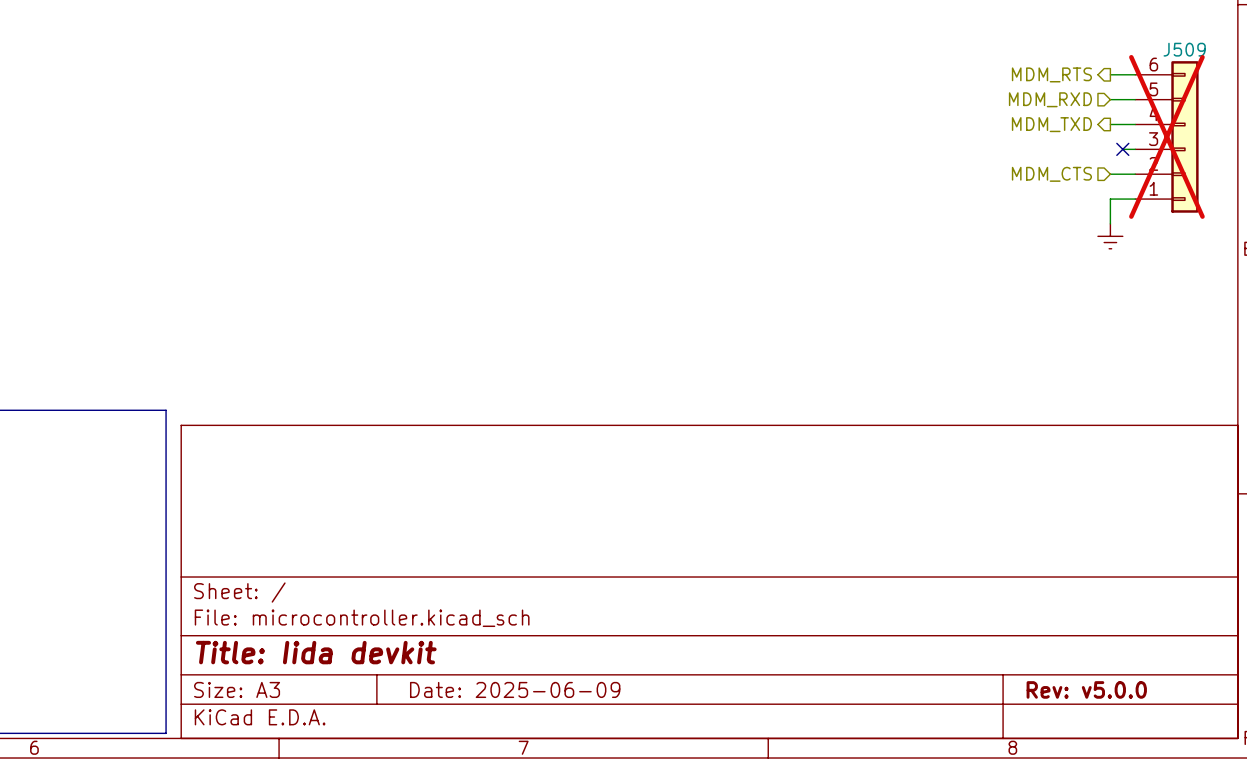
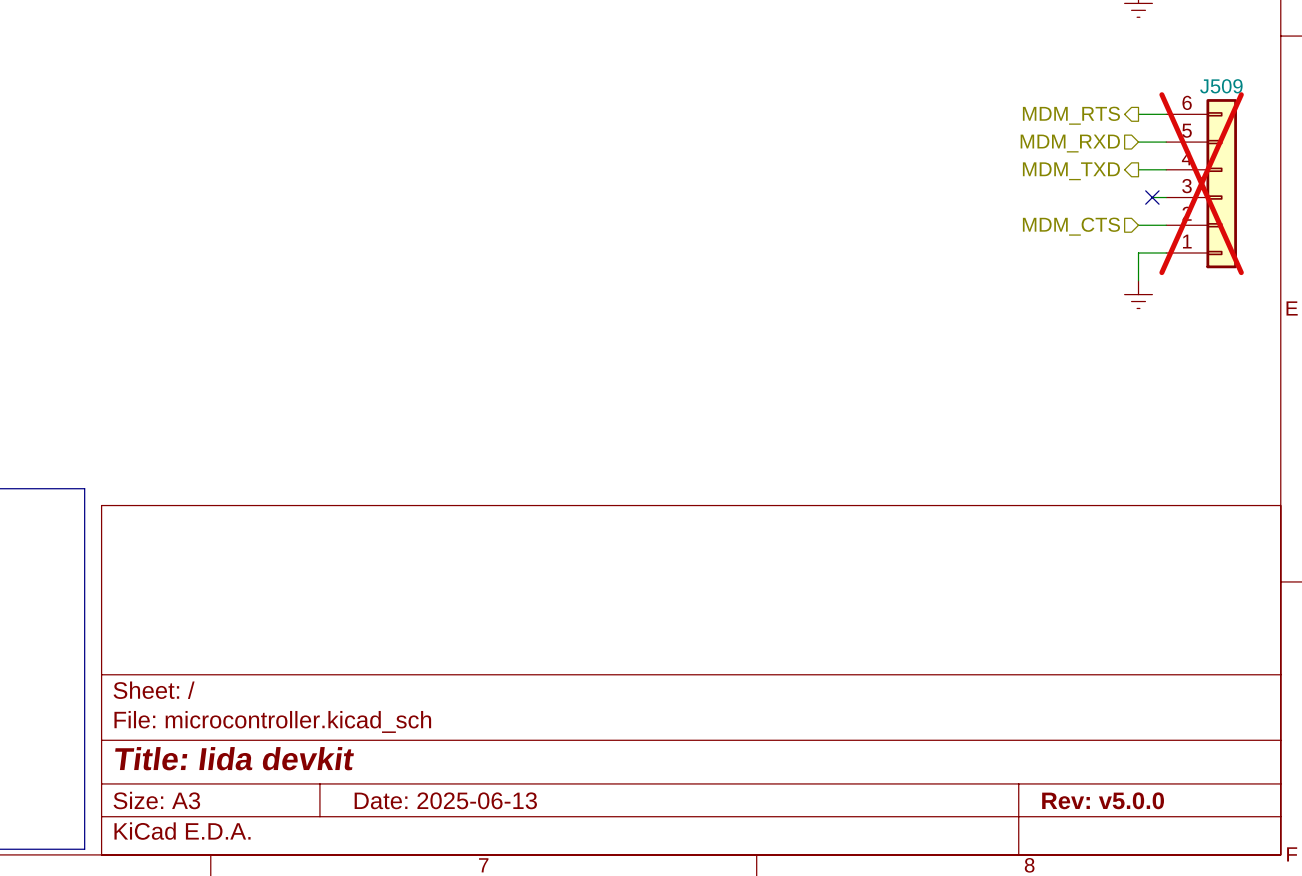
title block: Date: 2025-06-09 (515, 689) -> Date: 2025-06-13 (445, 800)

